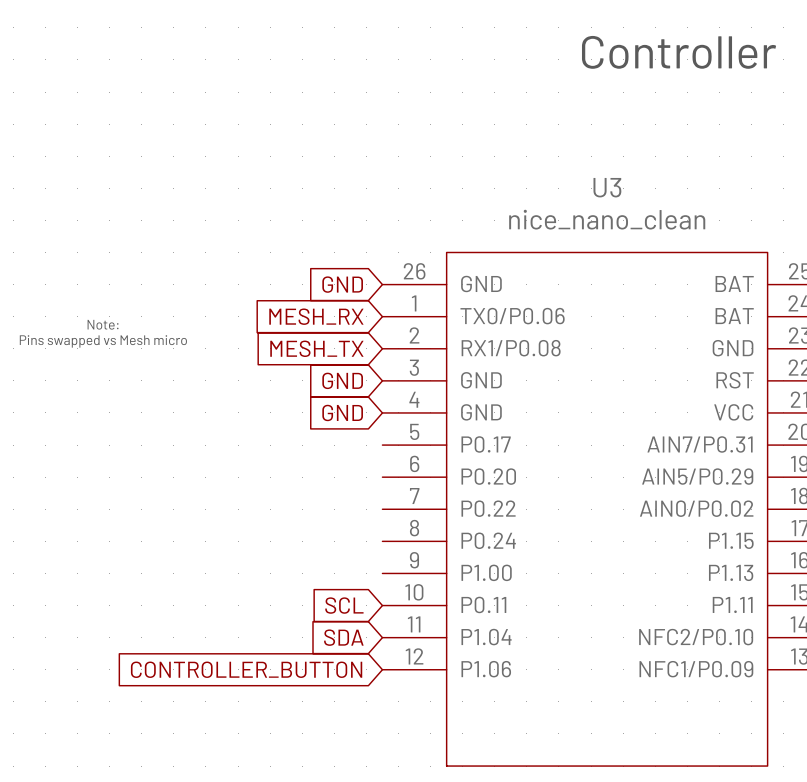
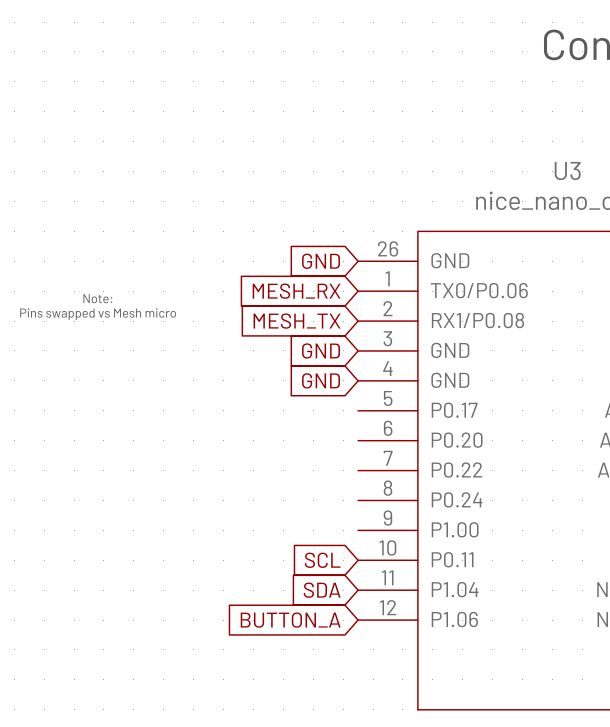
global label: CONTROLLER_BUTTON (246, 669) -> BUTTON_A (290, 620)

